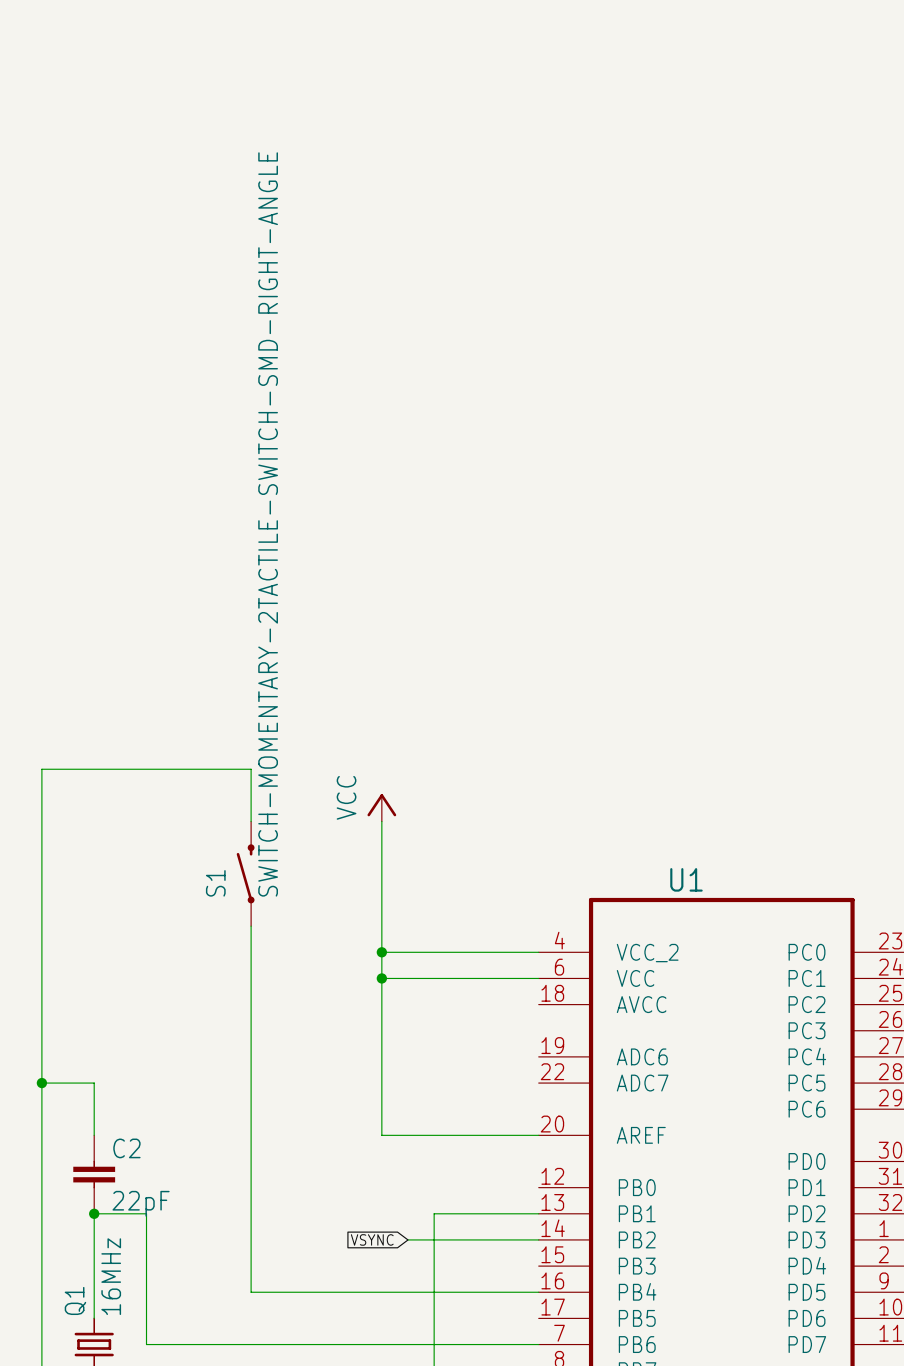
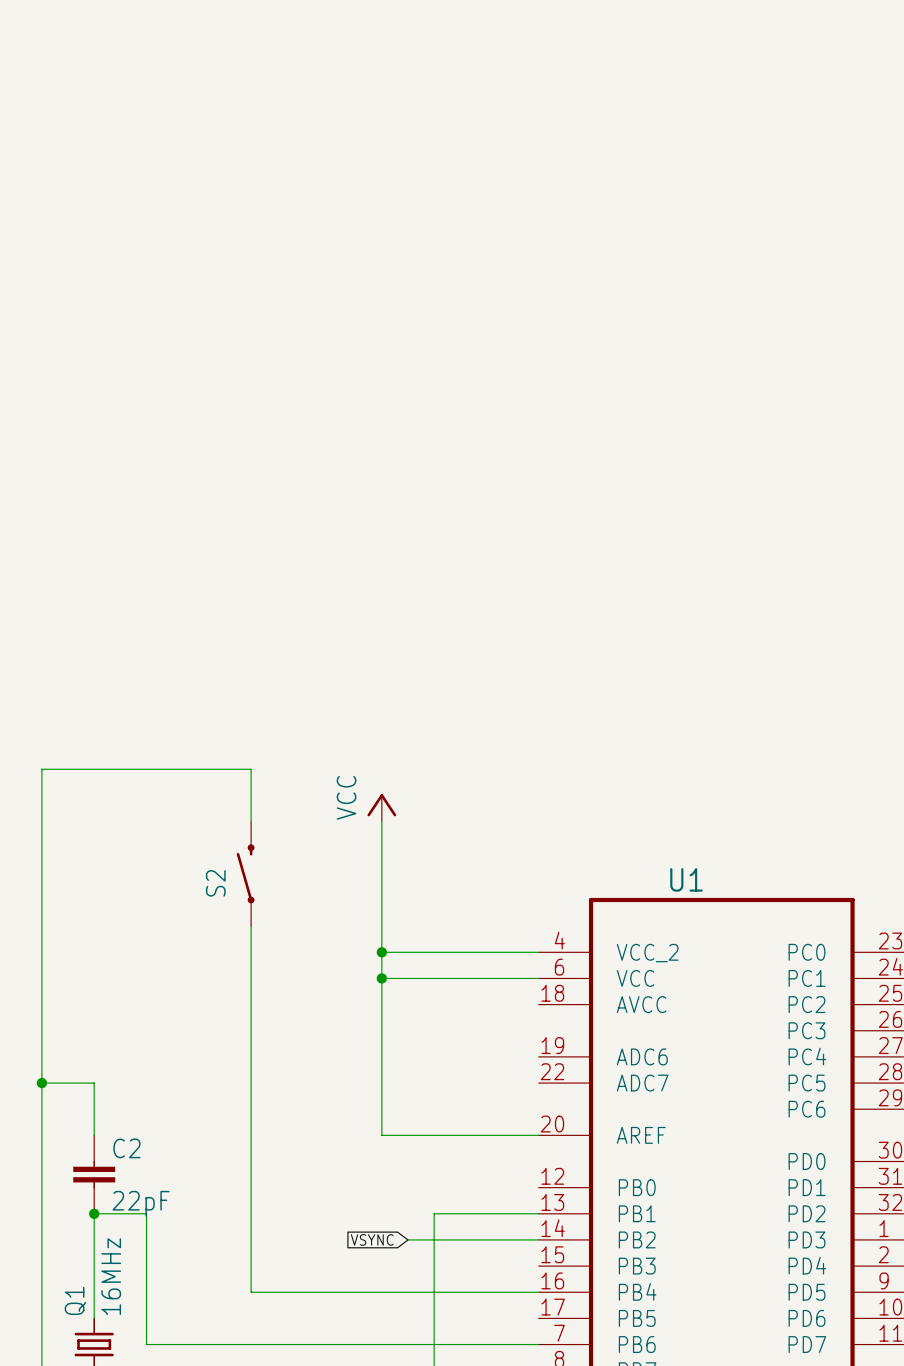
S1 value: SWITCH-MOMENTARY-2TACTILE-SWITCH-SMD-RIGHT-ANGLE (268, 524) -> none
S1 name: S1 (215, 883) -> S2 (215, 883)

